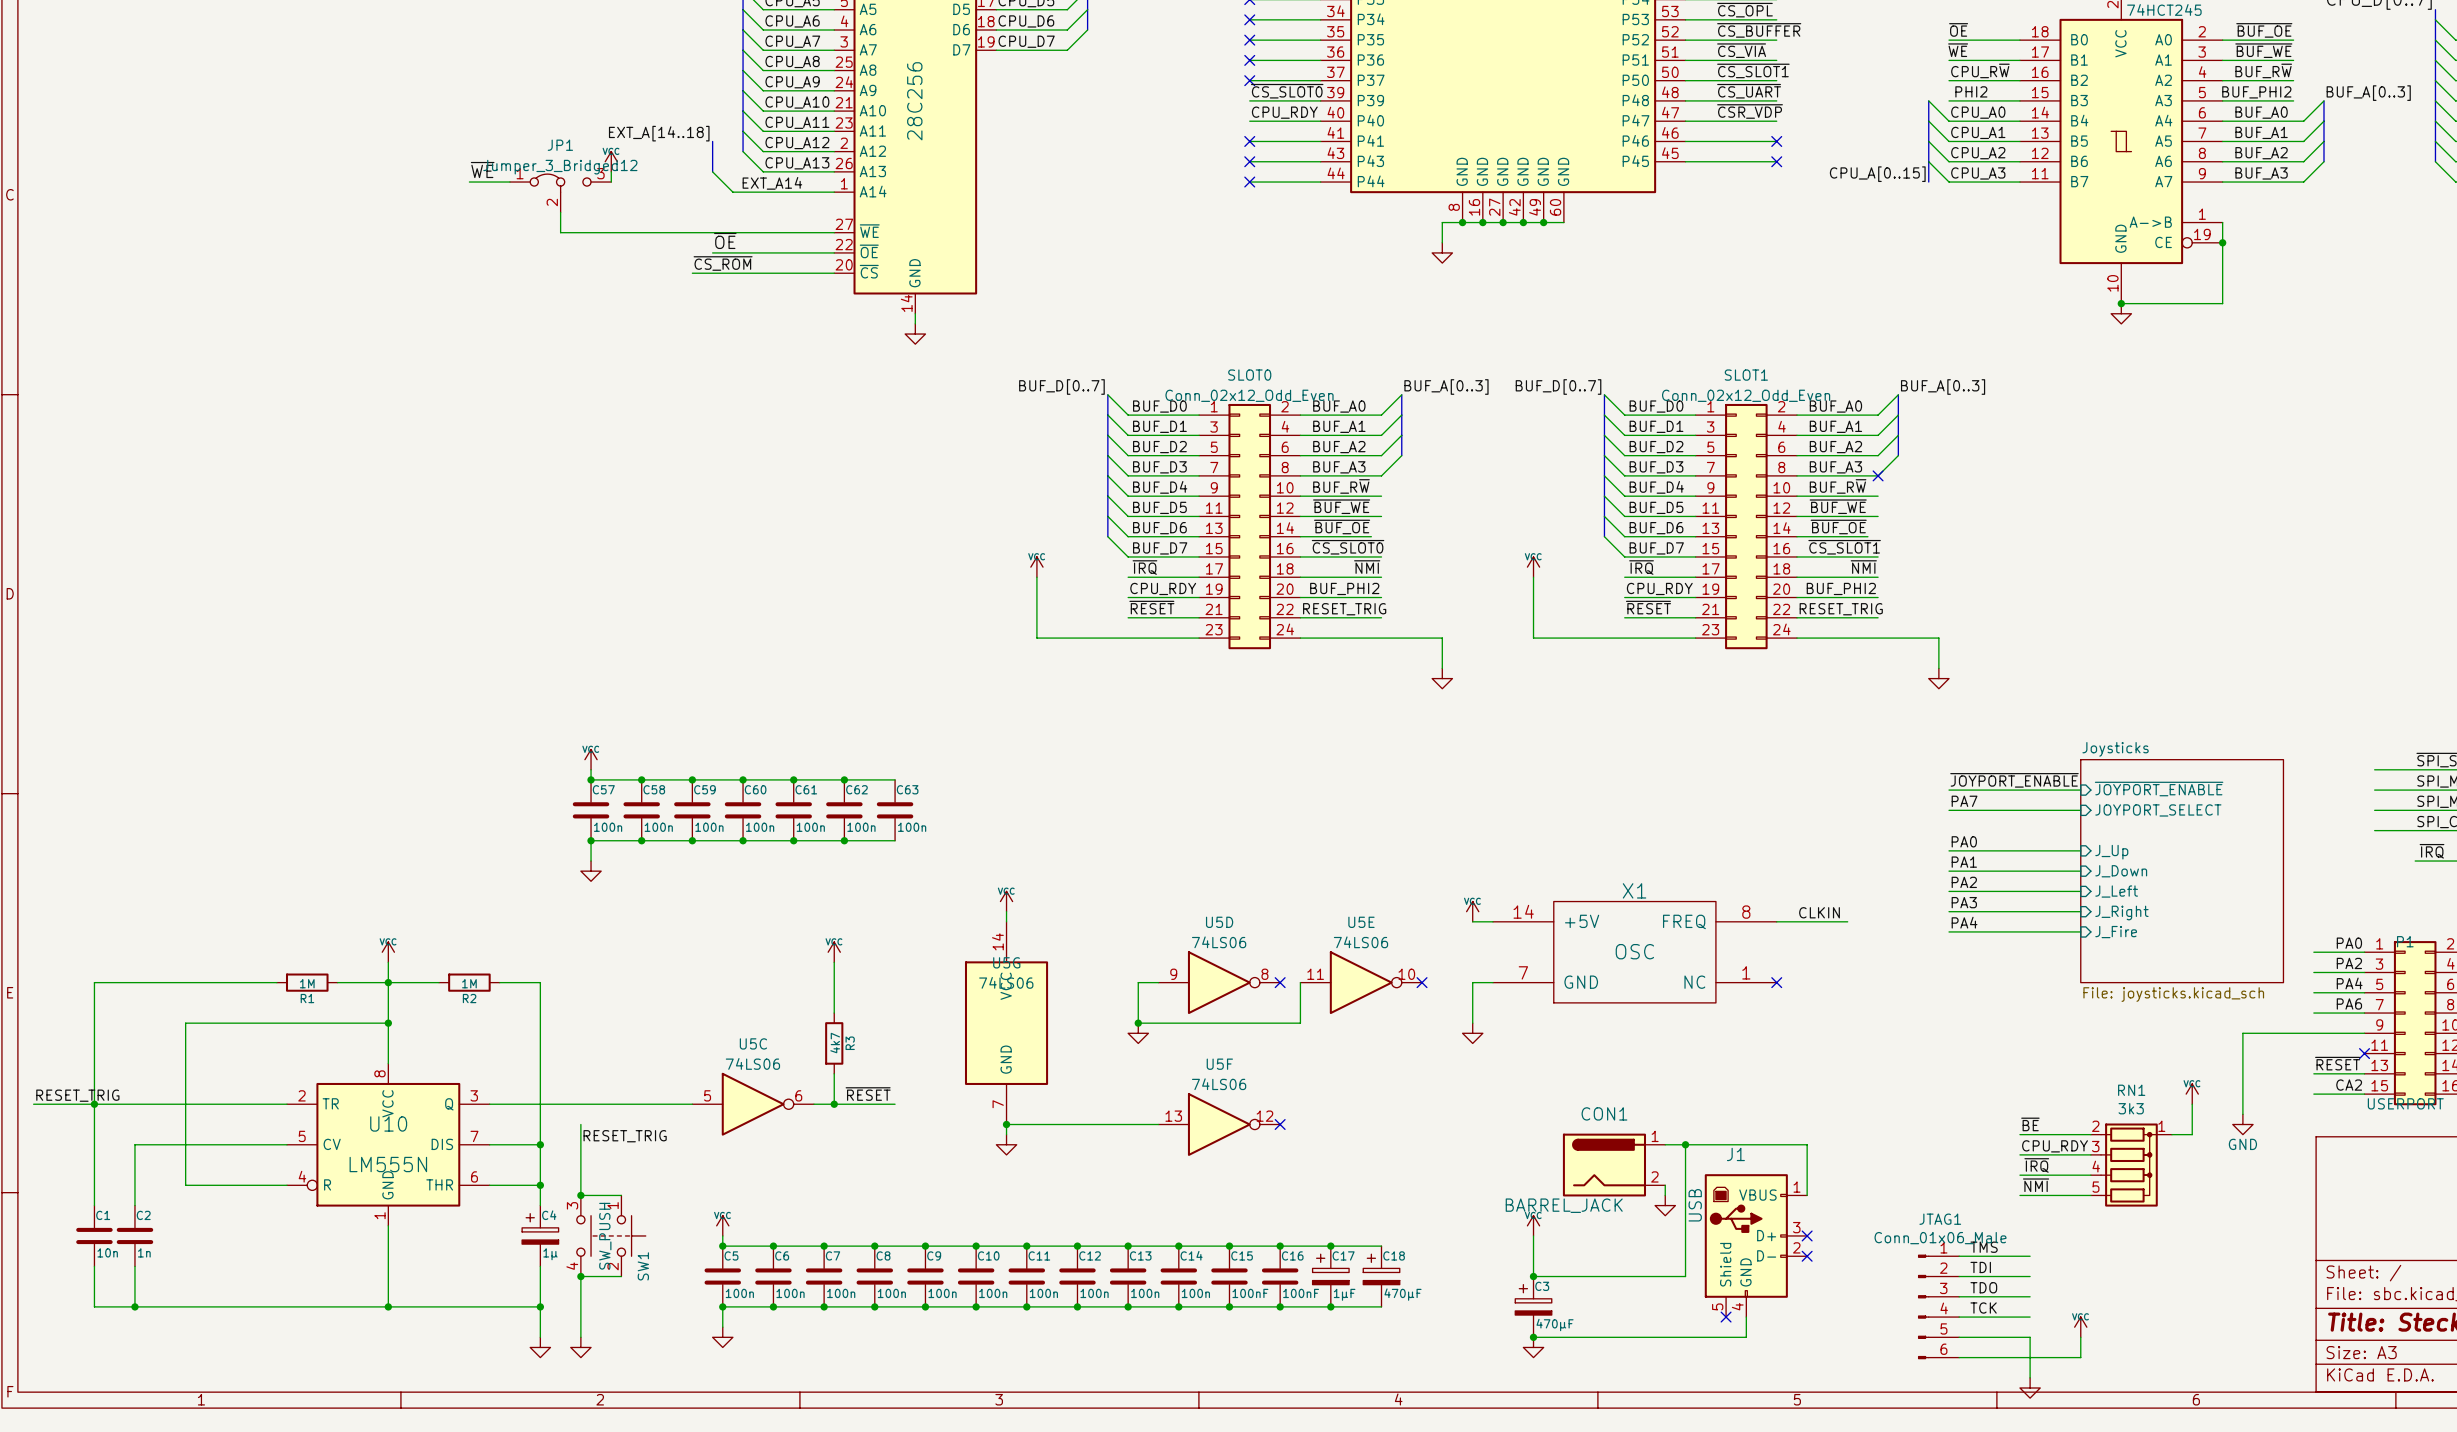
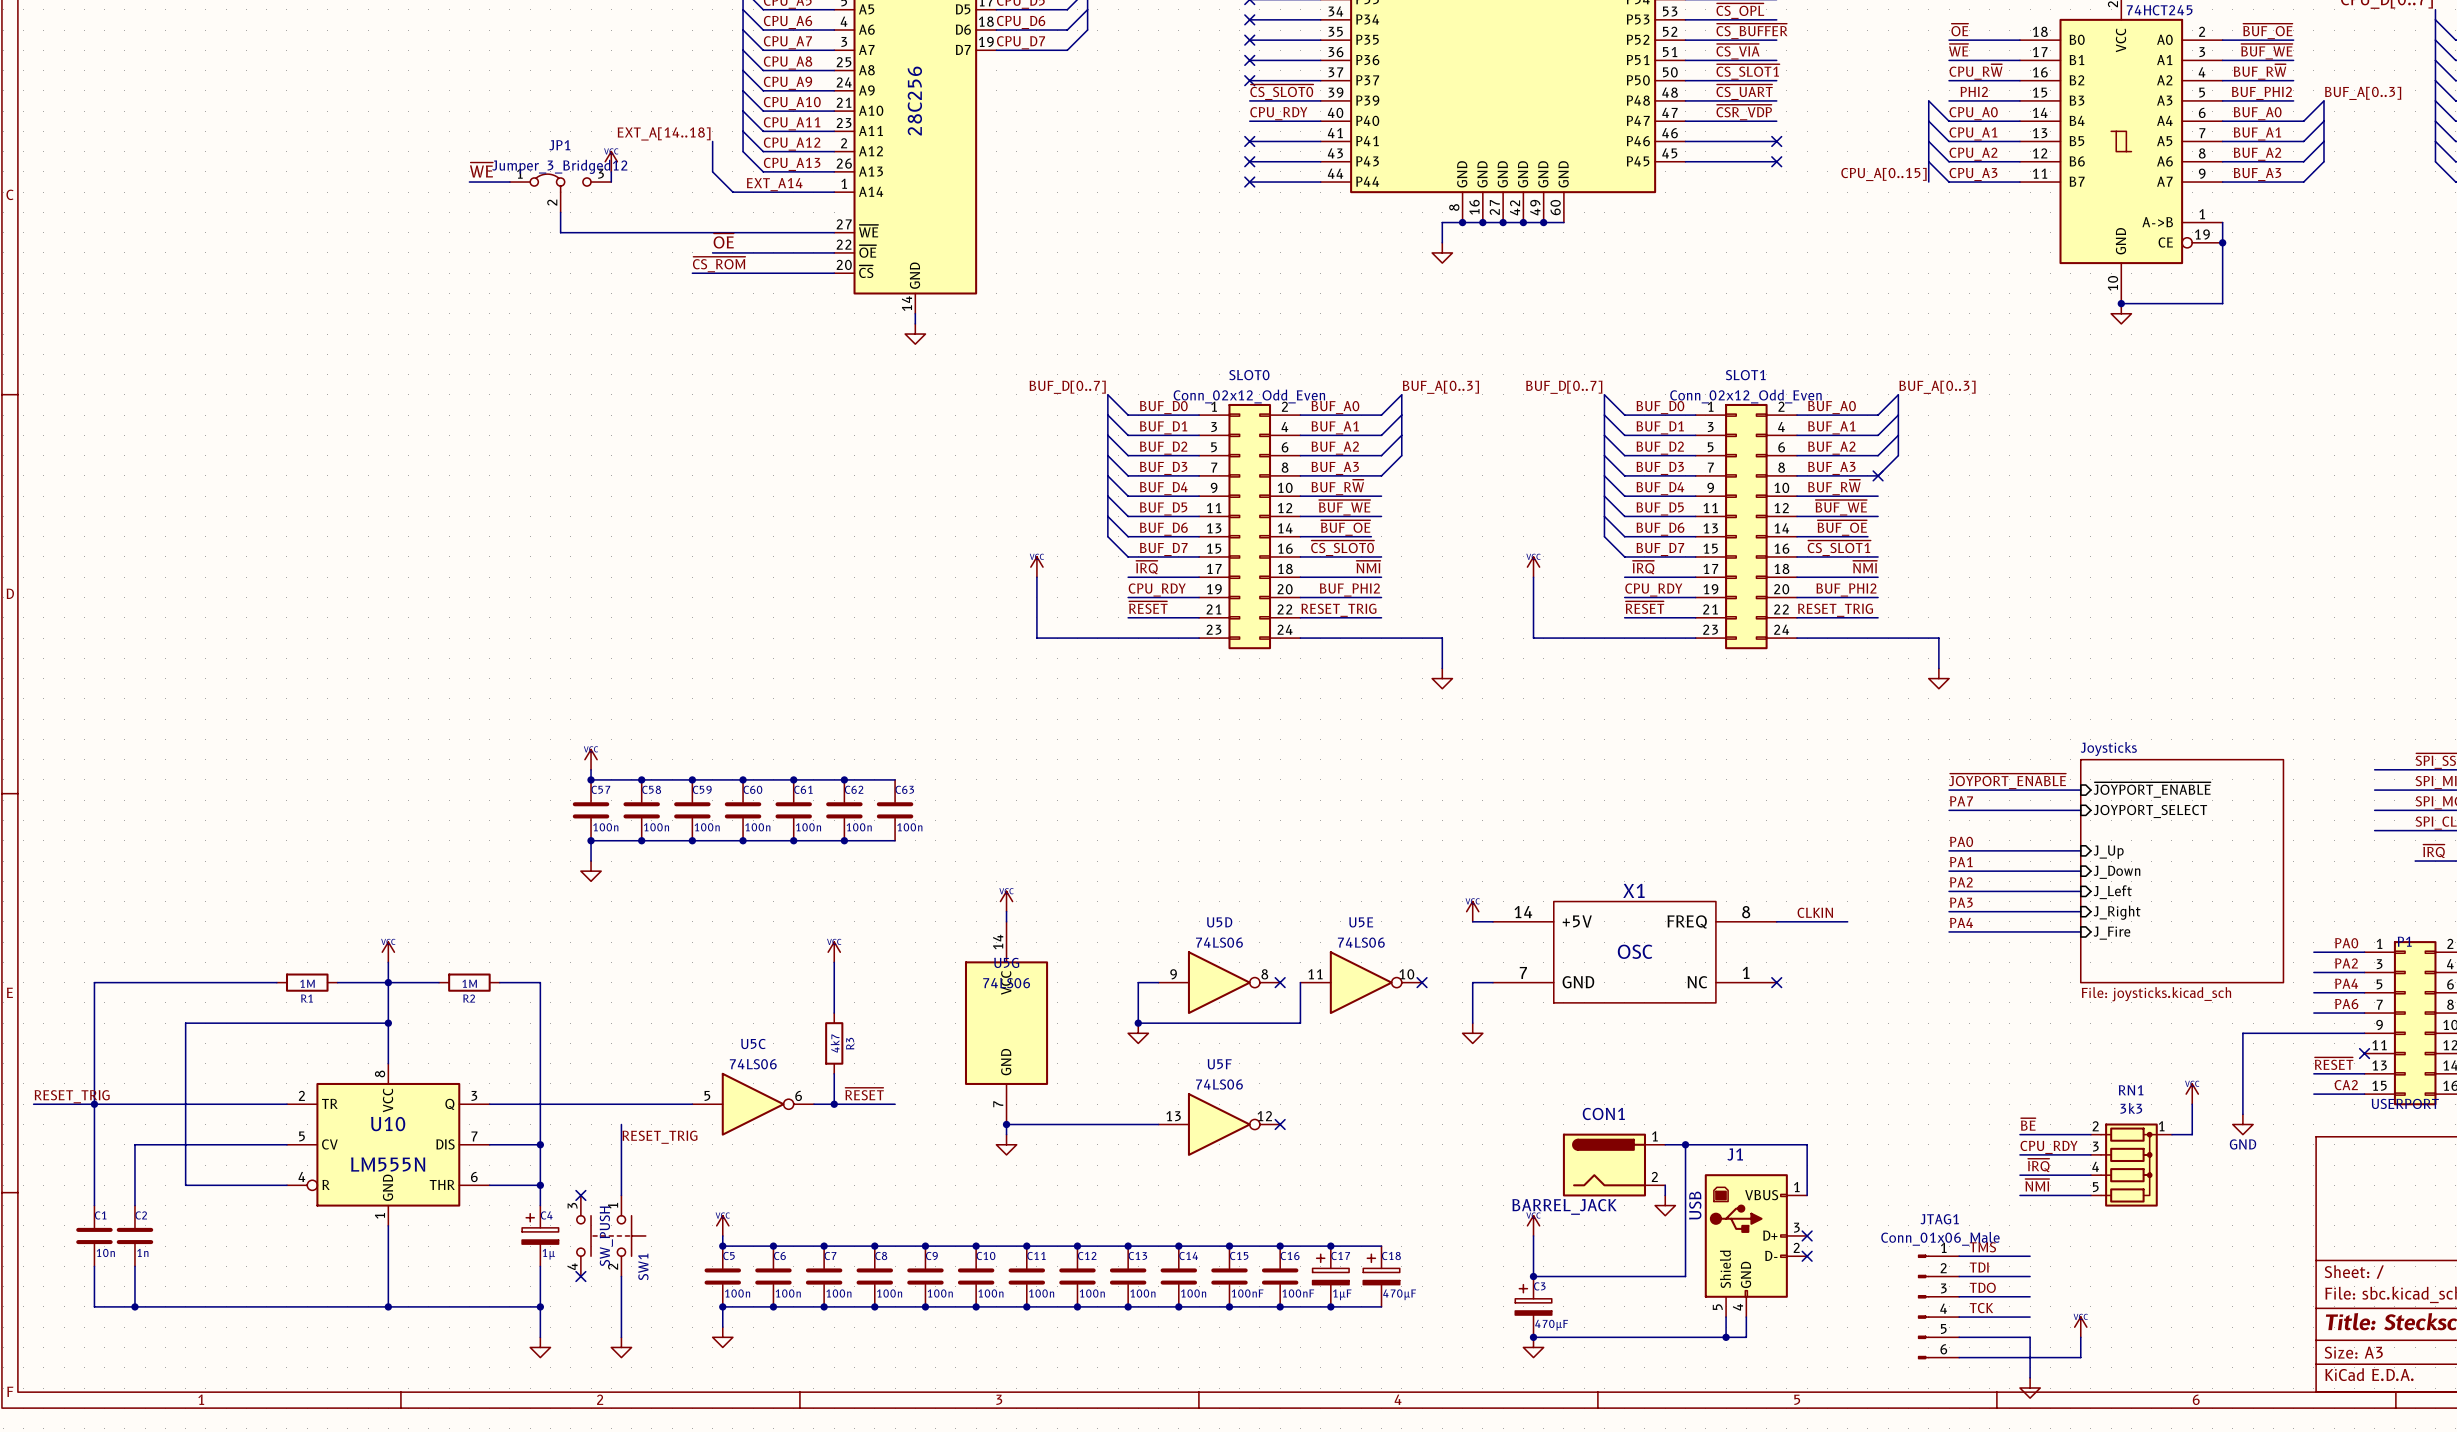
wire: (580, 1124) (580, 1195) (621, 1195) -> (621, 1124) (621, 1195)
label position: RESET_TRIG (625, 1136) -> RESET_TRIG (659, 1137)
junction: (580, 1195) -> none
no-connect mark: none -> (580, 1195)
junction: (580, 1276) -> none
no-connect mark: none -> (580, 1276)
wire: (621, 1276) (580, 1276) (580, 1337) -> (621, 1276) (621, 1337)
wire: none -> (1726, 1317) (1726, 1337)
no-connect mark: (1726, 1317) -> none
junction: none -> (1726, 1337)
power symbol position: (580, 1347) -> (621, 1347)

